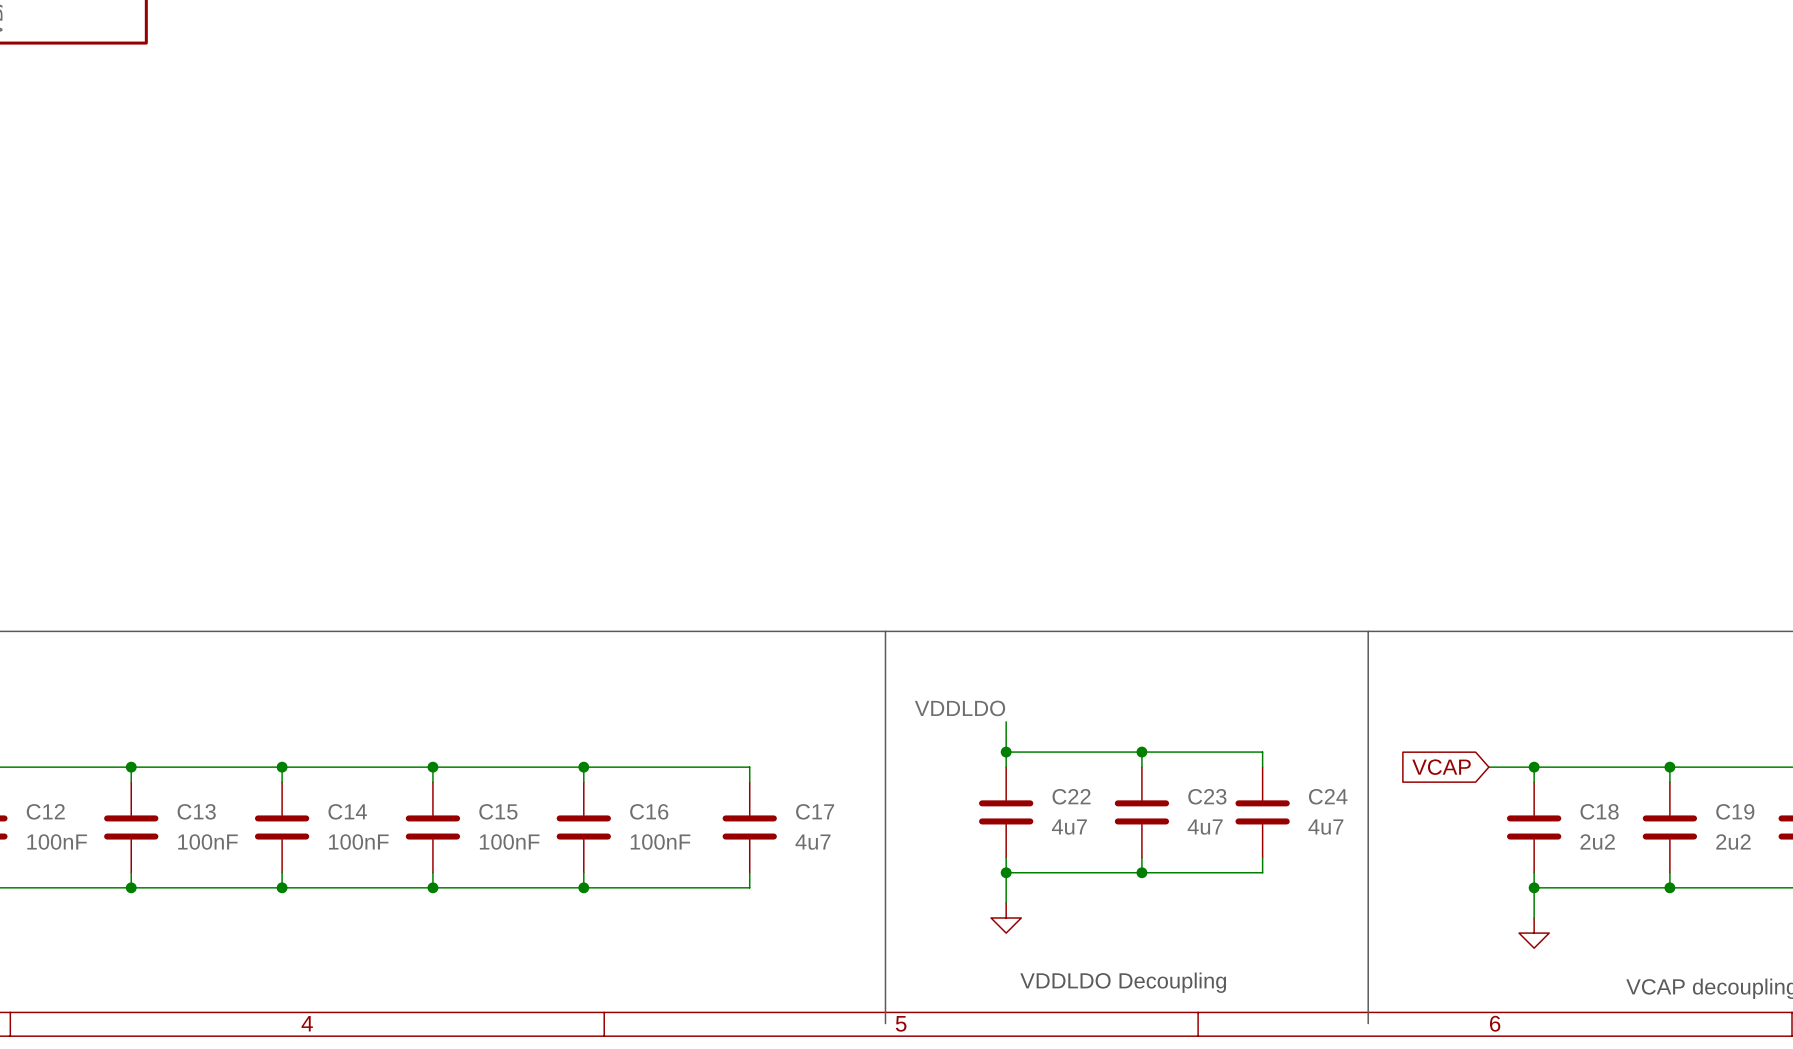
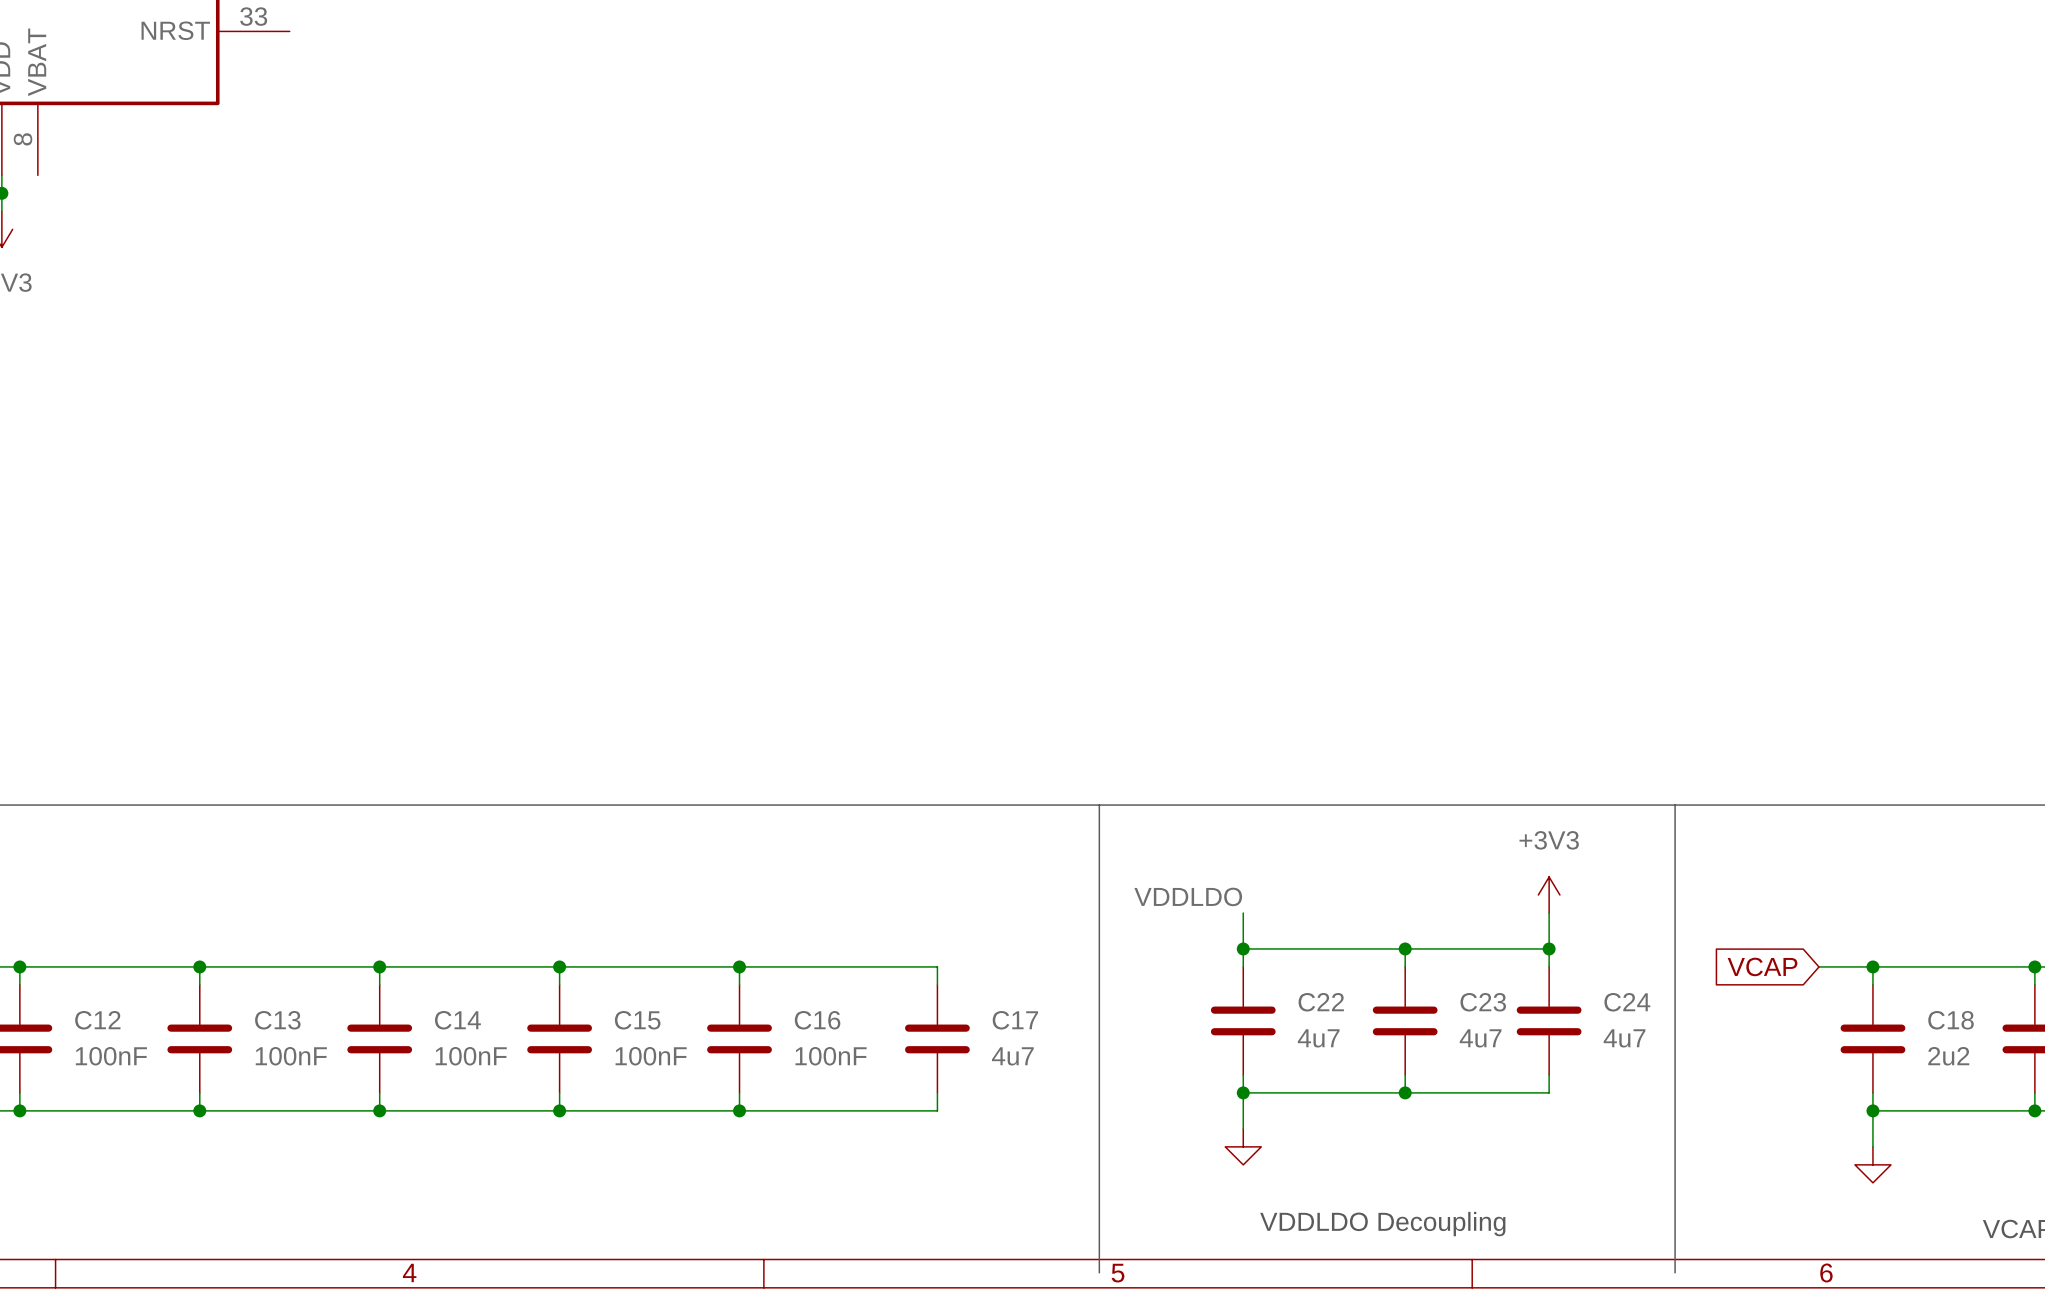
power symbol: none -> +3V3 (1549, 895)
wire: none -> (1549, 912) (1549, 948)
junction: none -> (1549, 948)

